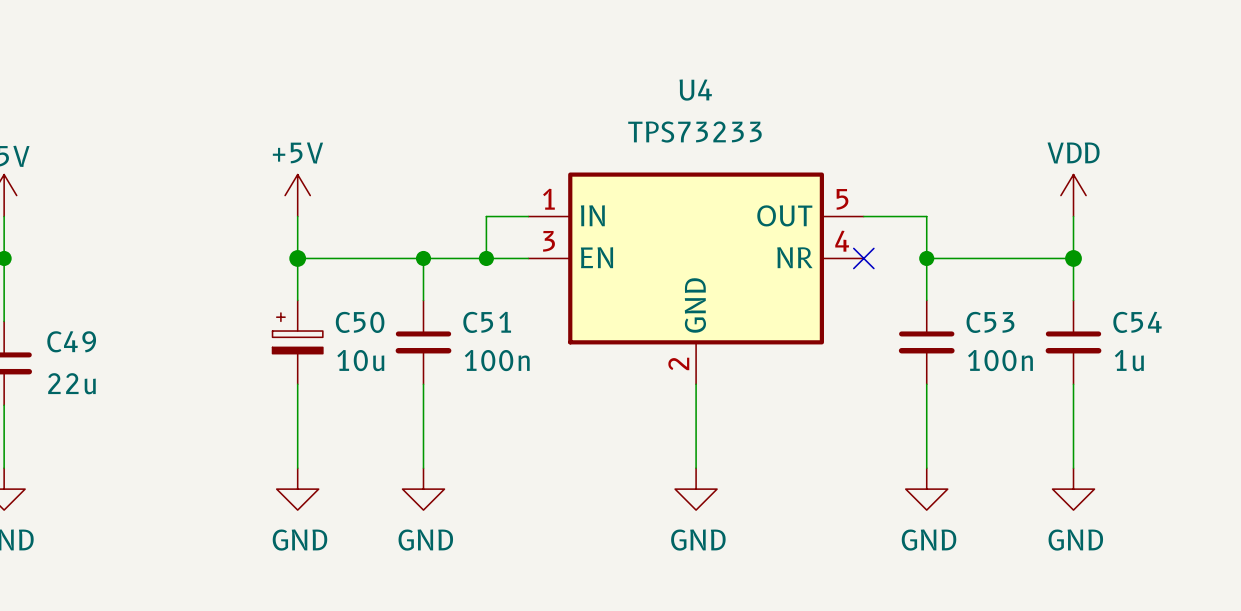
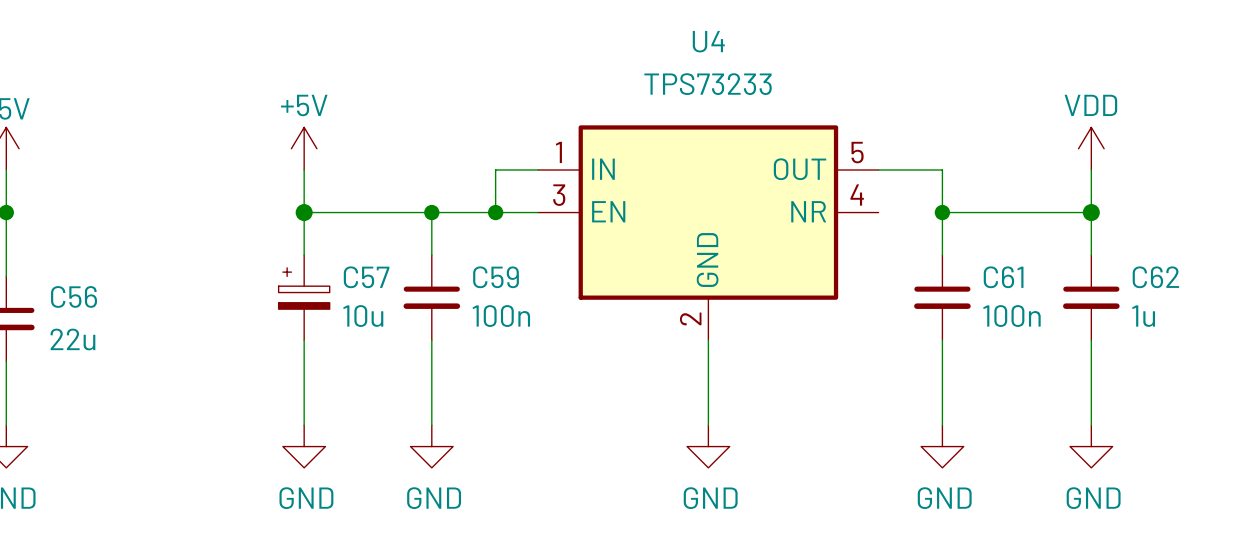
no-connect mark: (863, 258) -> none
C50 name: C50 (360, 322) -> C57 (366, 277)
C51 name: C51 (487, 322) -> C59 (496, 277)
C53 name: C53 (990, 322) -> C61 (1003, 277)
C54 name: C54 (1137, 322) -> C62 (1155, 277)
C49 name: C49 (71, 341) -> C56 (74, 296)

